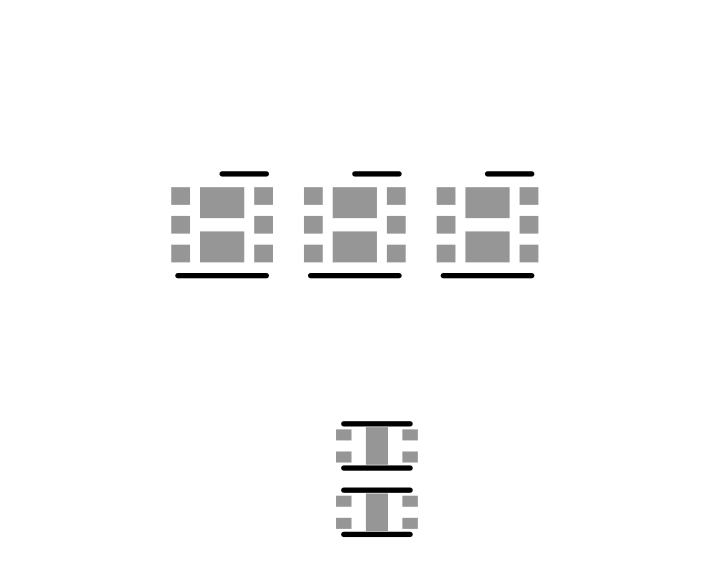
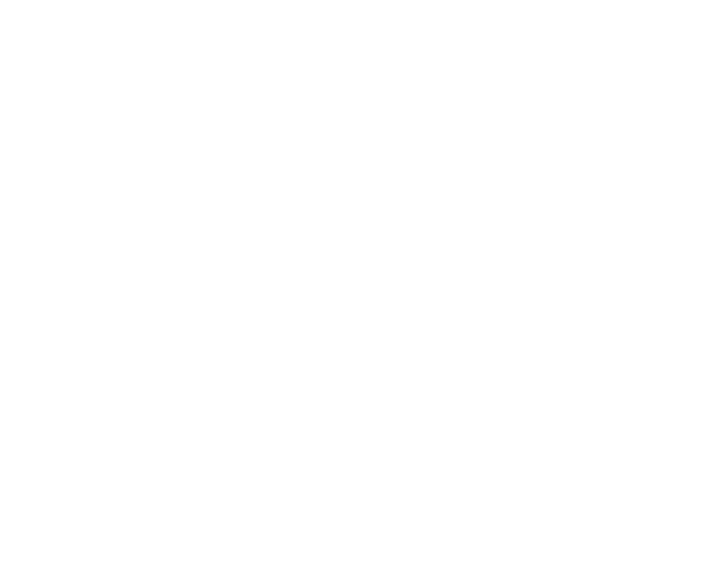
part: (222, 224) -> none
part: (354, 224) -> none
part: (487, 224) -> none
part: (376, 445) -> none
part: (376, 512) -> none

